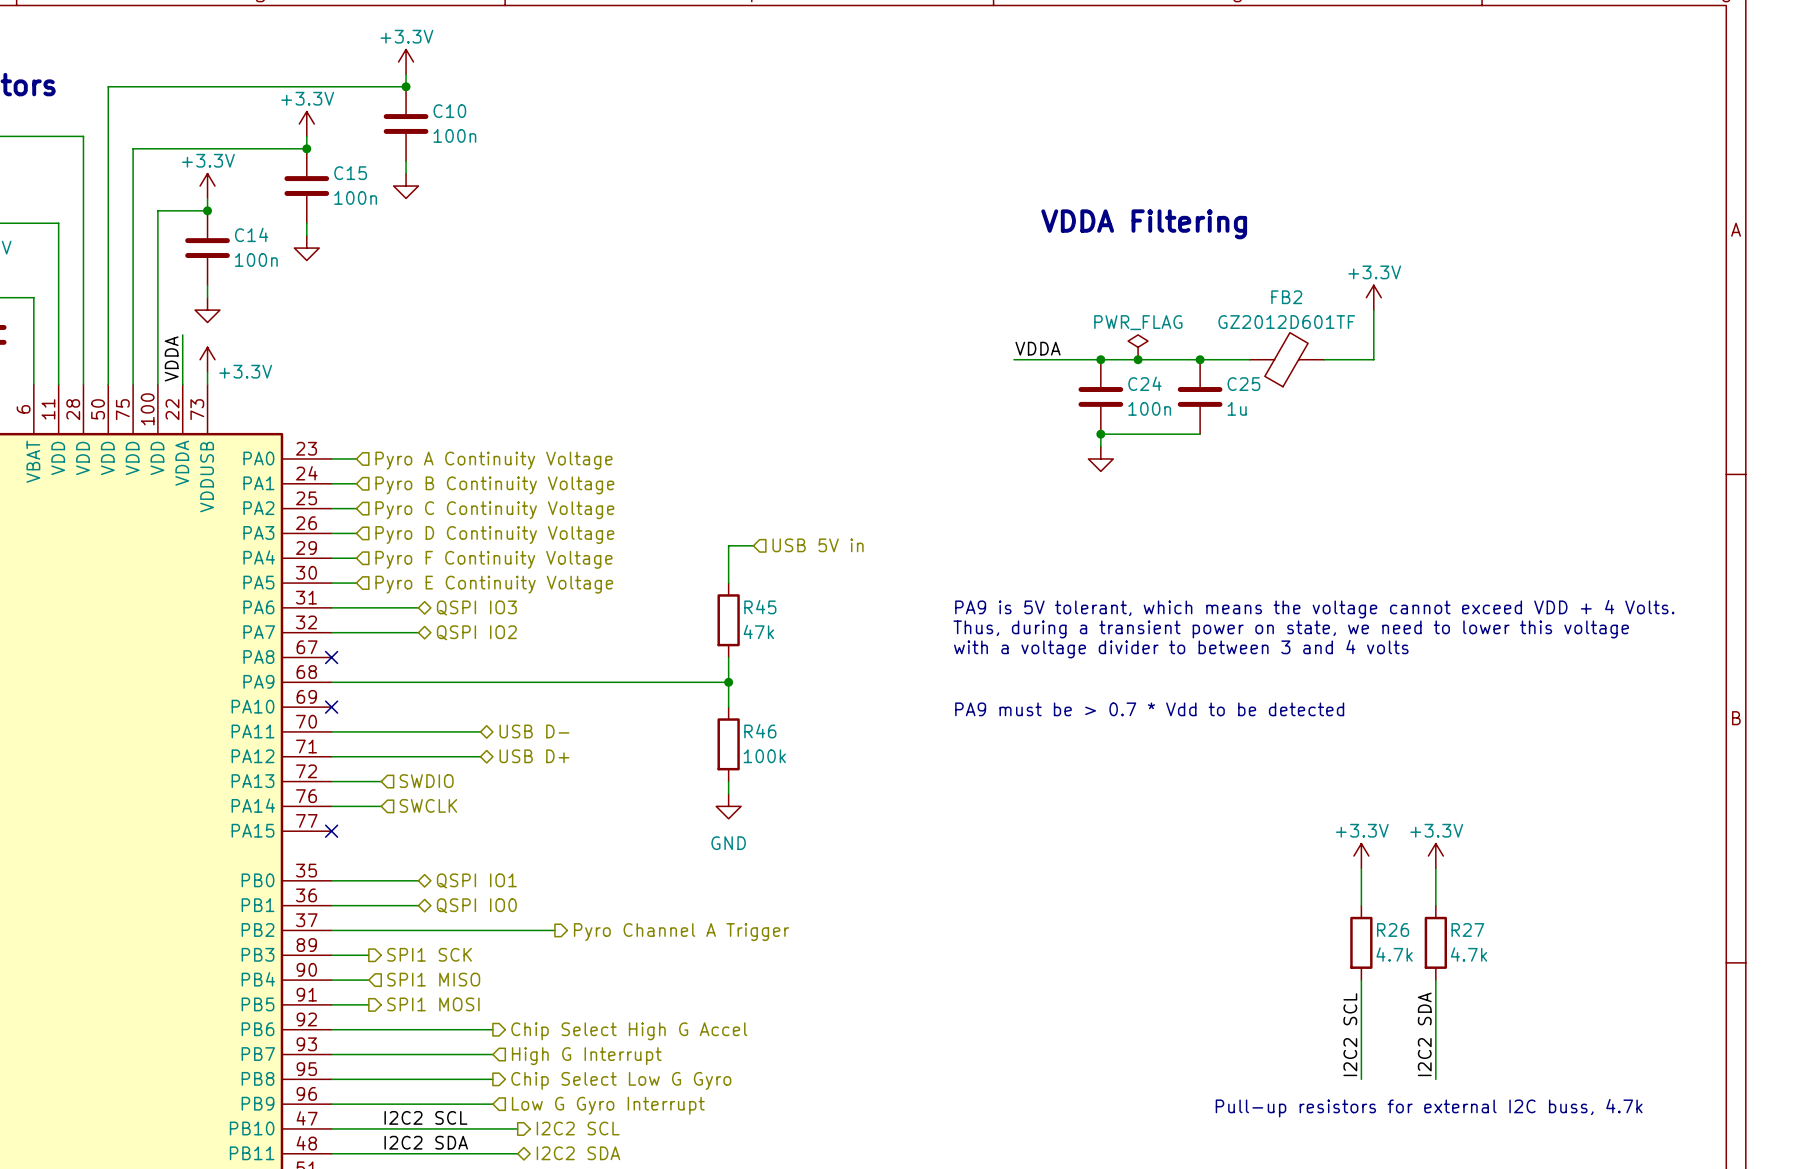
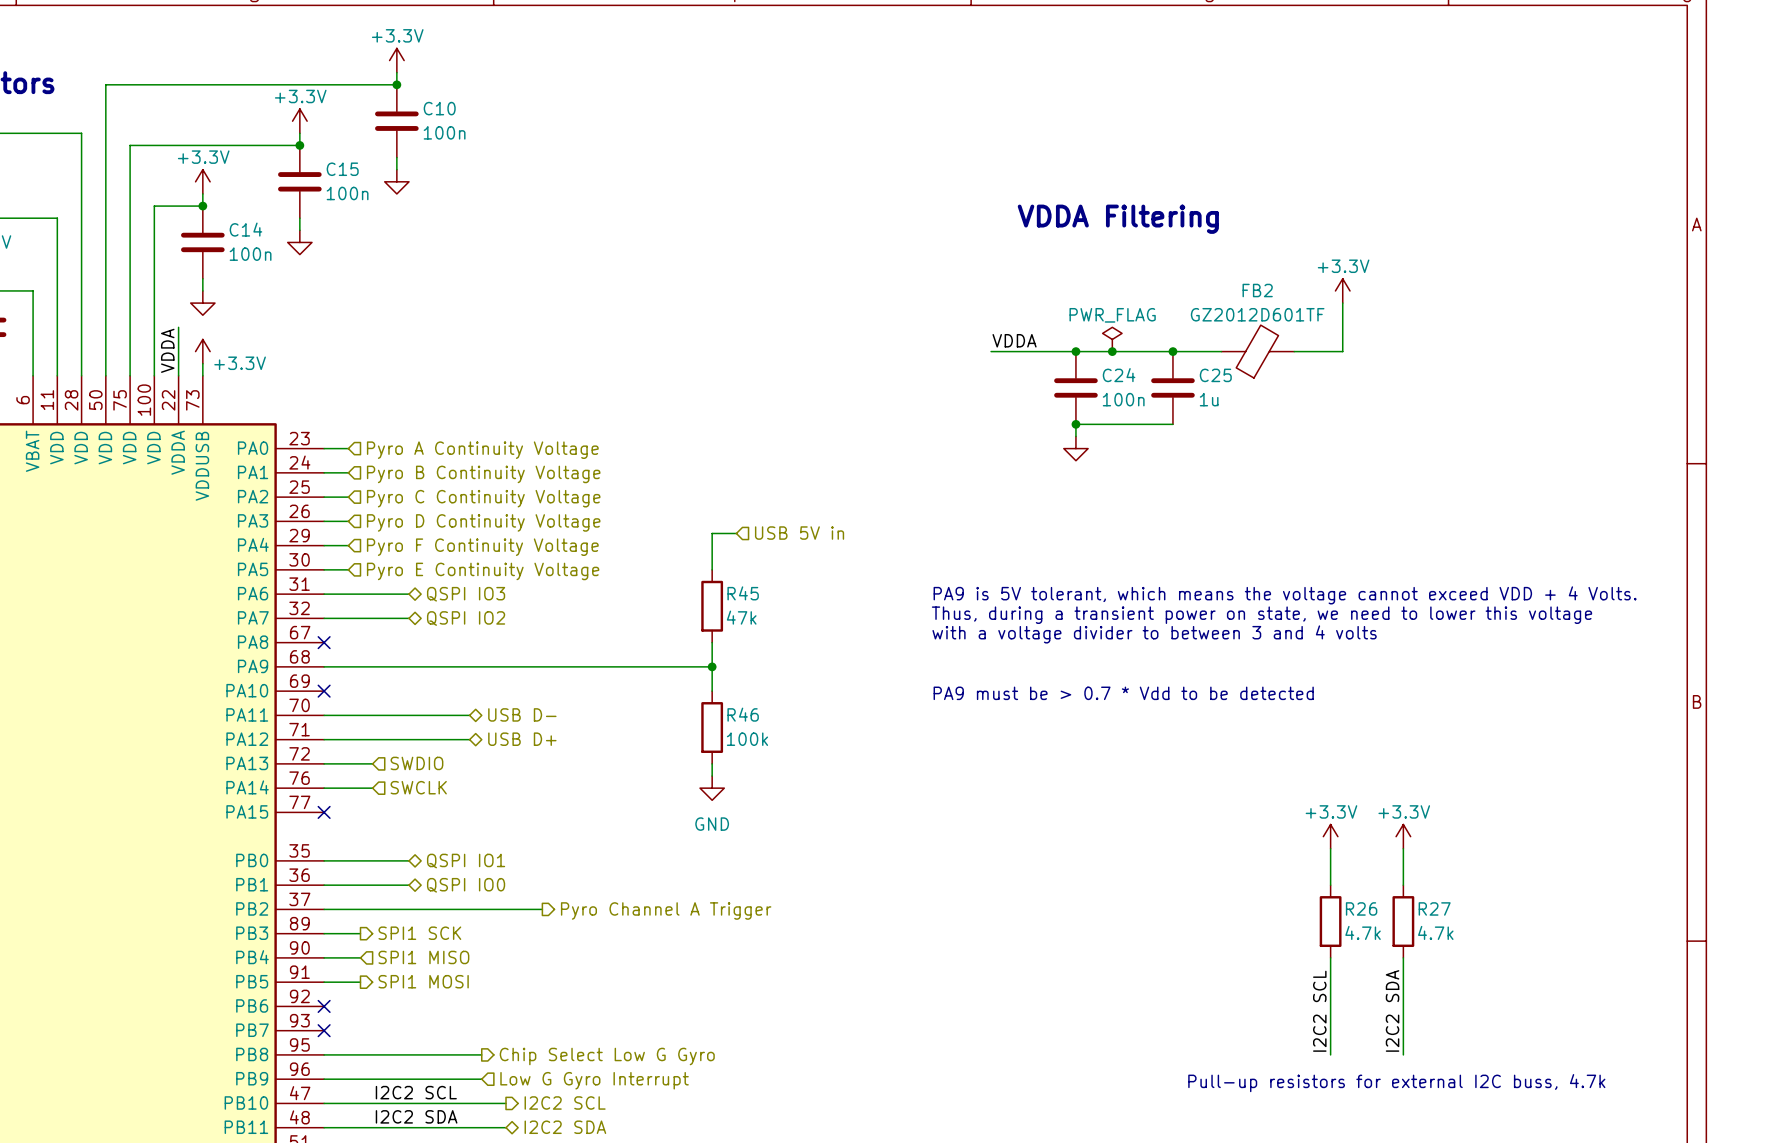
wire: (331, 1029) (492, 1029) -> none
no-connect mark: none -> (324, 1006)
hierarchical label: Chip Select High G Accel (629, 1031) -> none
wire: (331, 1054) (492, 1054) -> none
no-connect mark: none -> (324, 1030)
hierarchical label: High G Interrupt (586, 1056) -> none

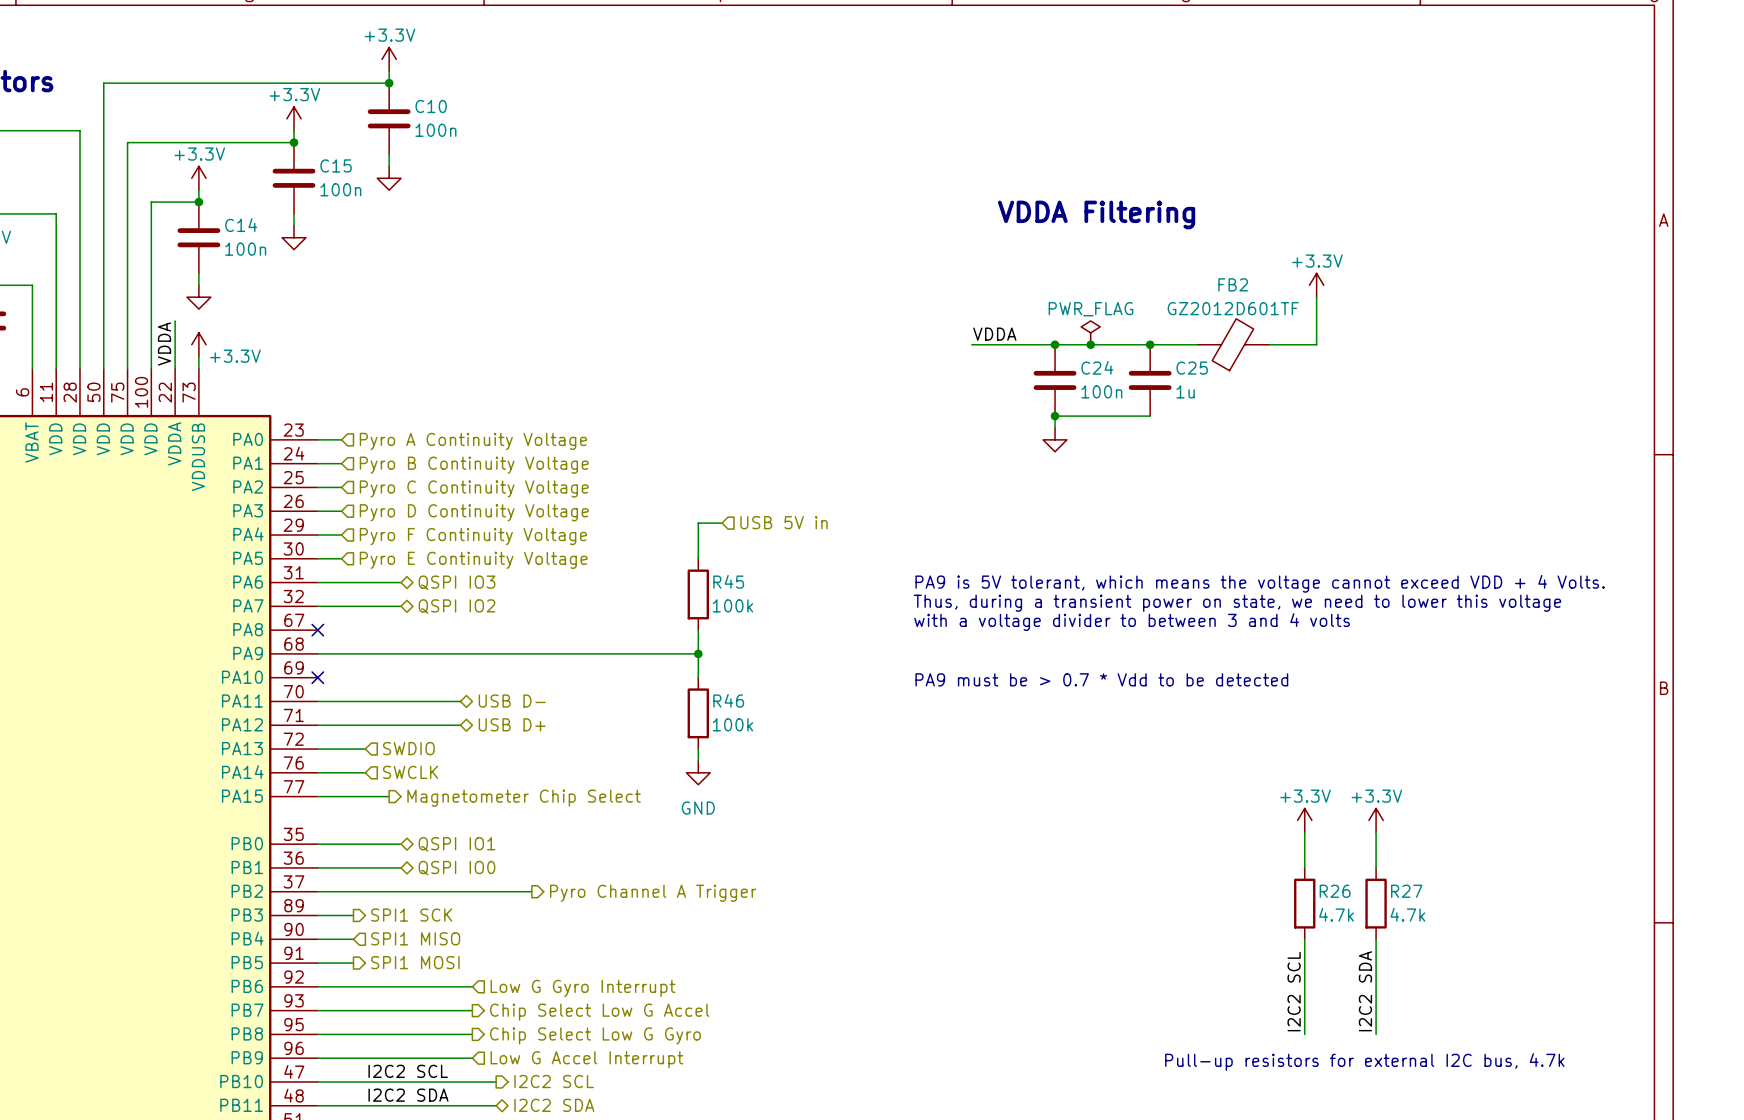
R45 value: 47k (741, 617) -> 100k (732, 605)
wire: none -> (317, 796) (389, 796)
no-connect mark: (324, 812) -> none
hierarchical label: none -> Magnetometer Chip Select (524, 798)
wire: none -> (317, 986) (472, 986)
no-connect mark: (324, 1006) -> none
hierarchical label: none -> Low G Gyro Interrupt (582, 988)
wire: none -> (317, 1010) (472, 1010)
no-connect mark: (324, 1030) -> none
hierarchical label: none -> Chip Select Low G Accel (599, 1012)
hierarchical label: Low G Gyro Interrupt (594, 1080) -> Low G Accel Interrupt (586, 1059)
text: Pull-up resistors for external I2C buss, 4.7k (1396, 1083) -> Pull-up resistors for external I2C bus, 4.7k (1364, 1062)

